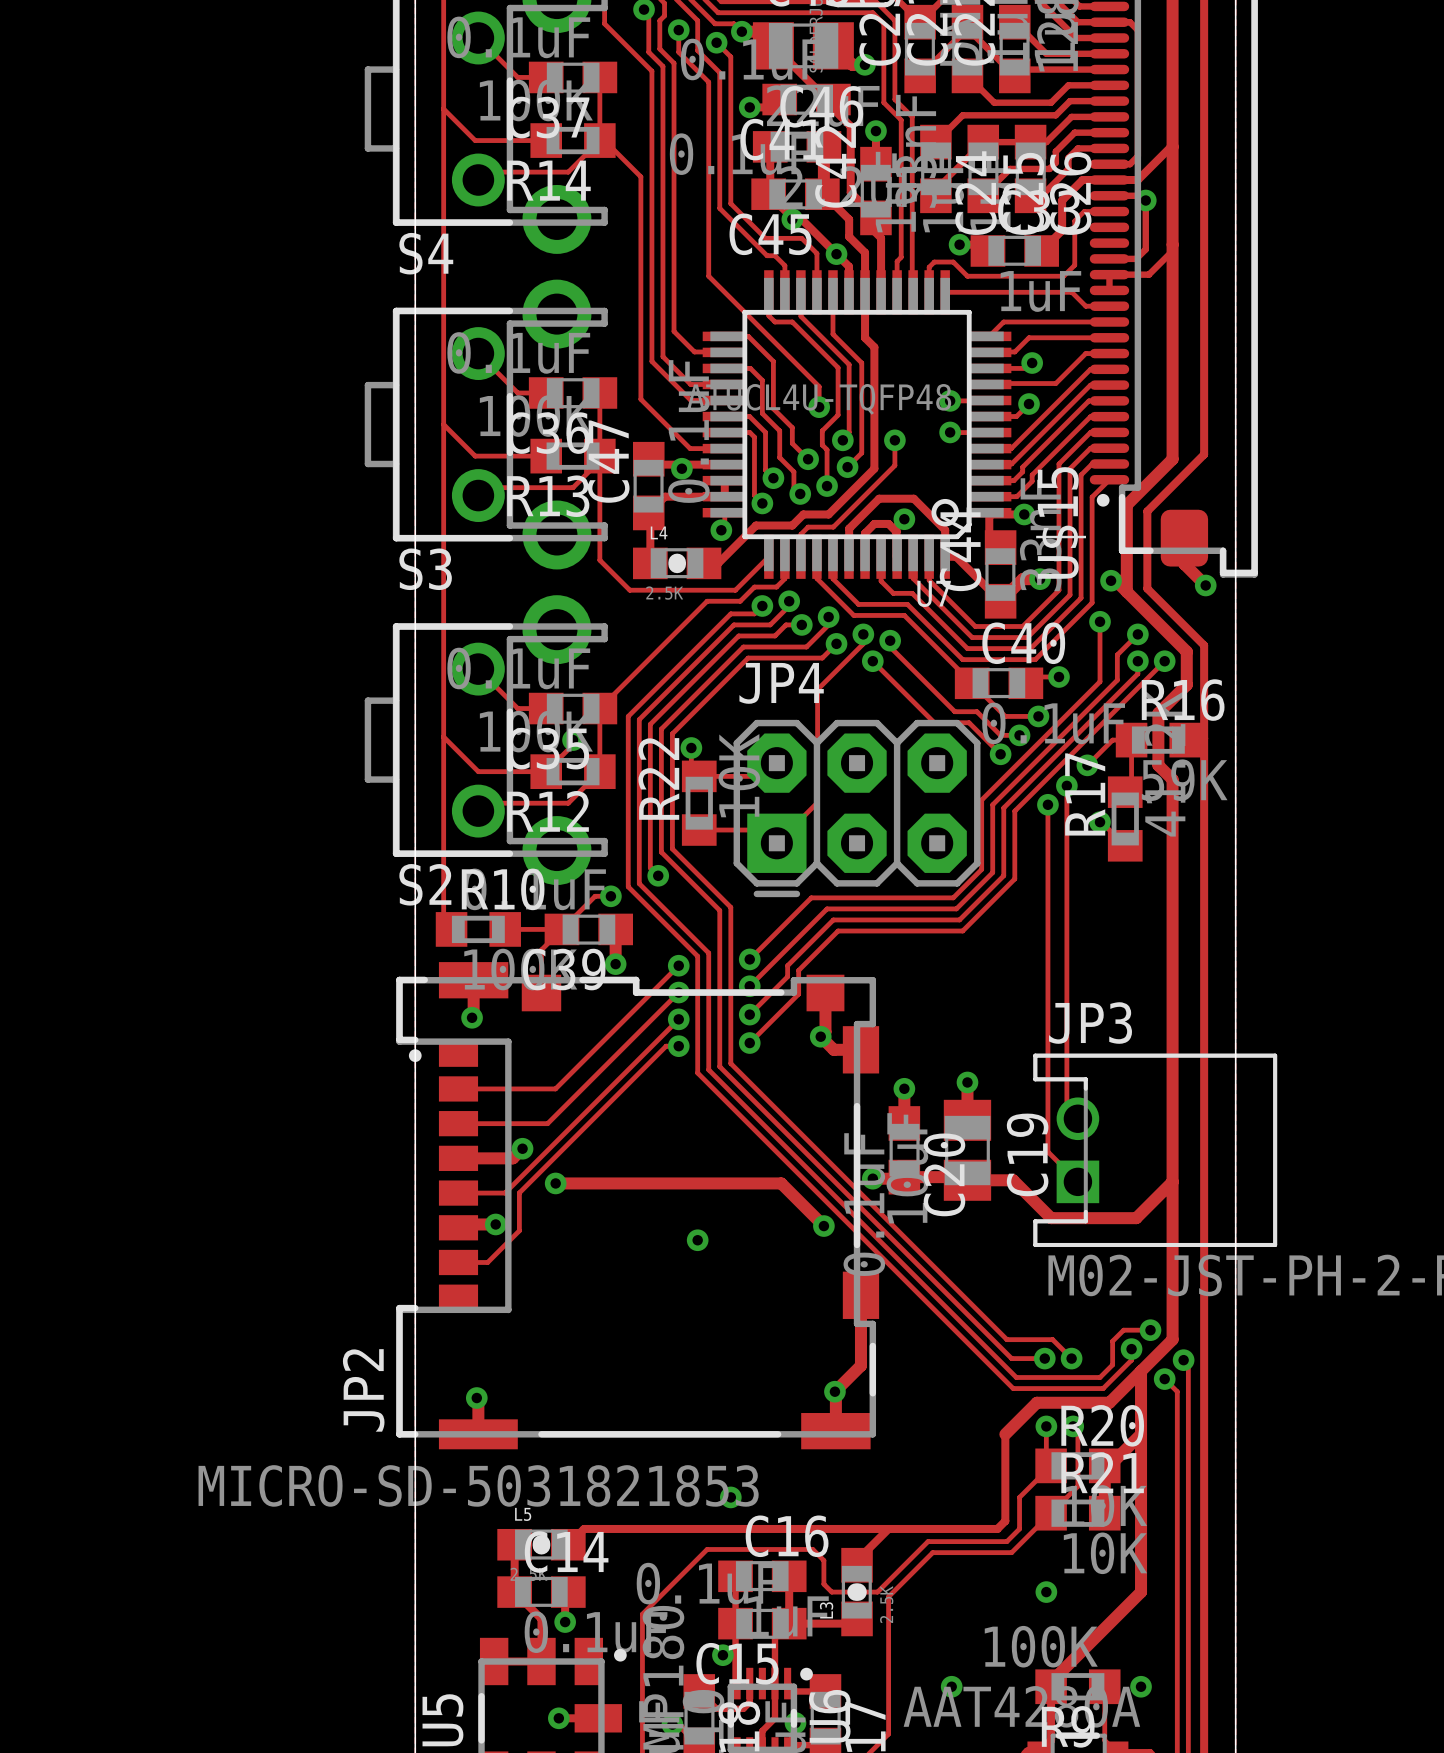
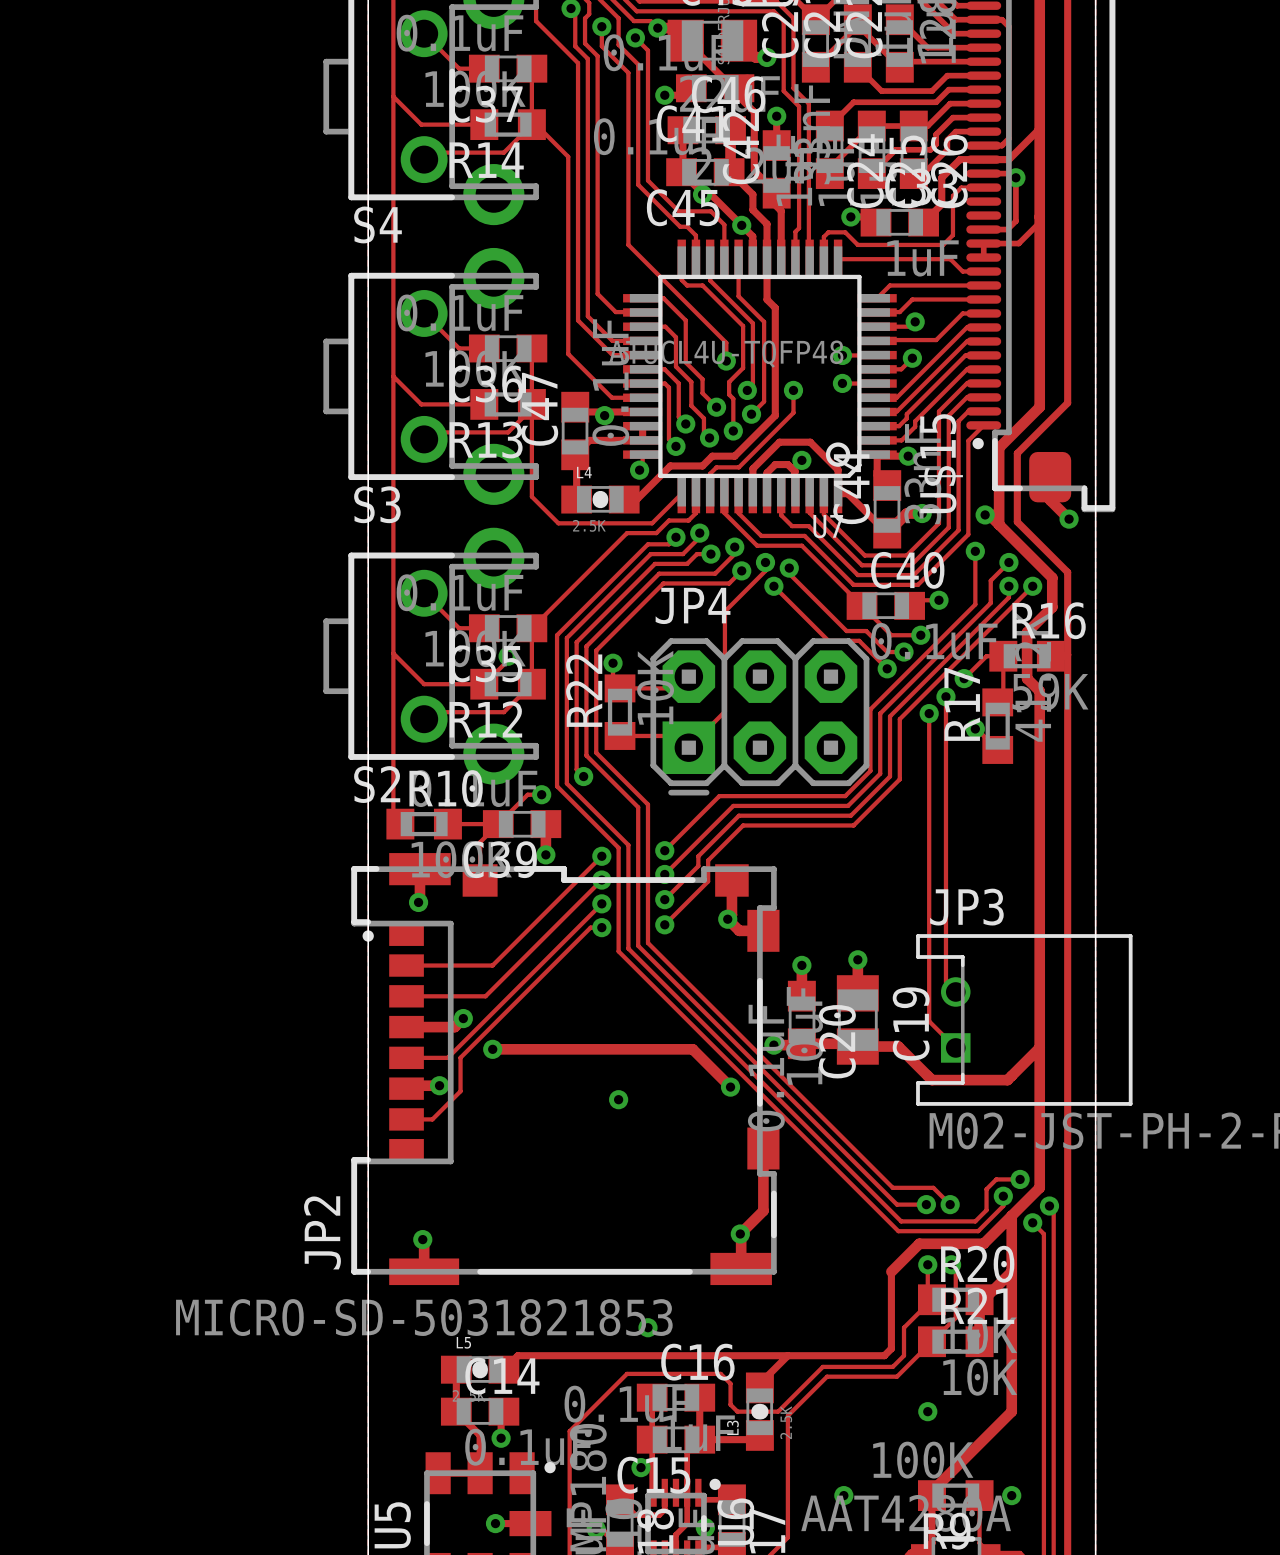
JP3 footprint: [1033, 1053, 1278, 1247] -> [916, 934, 1133, 1106]

